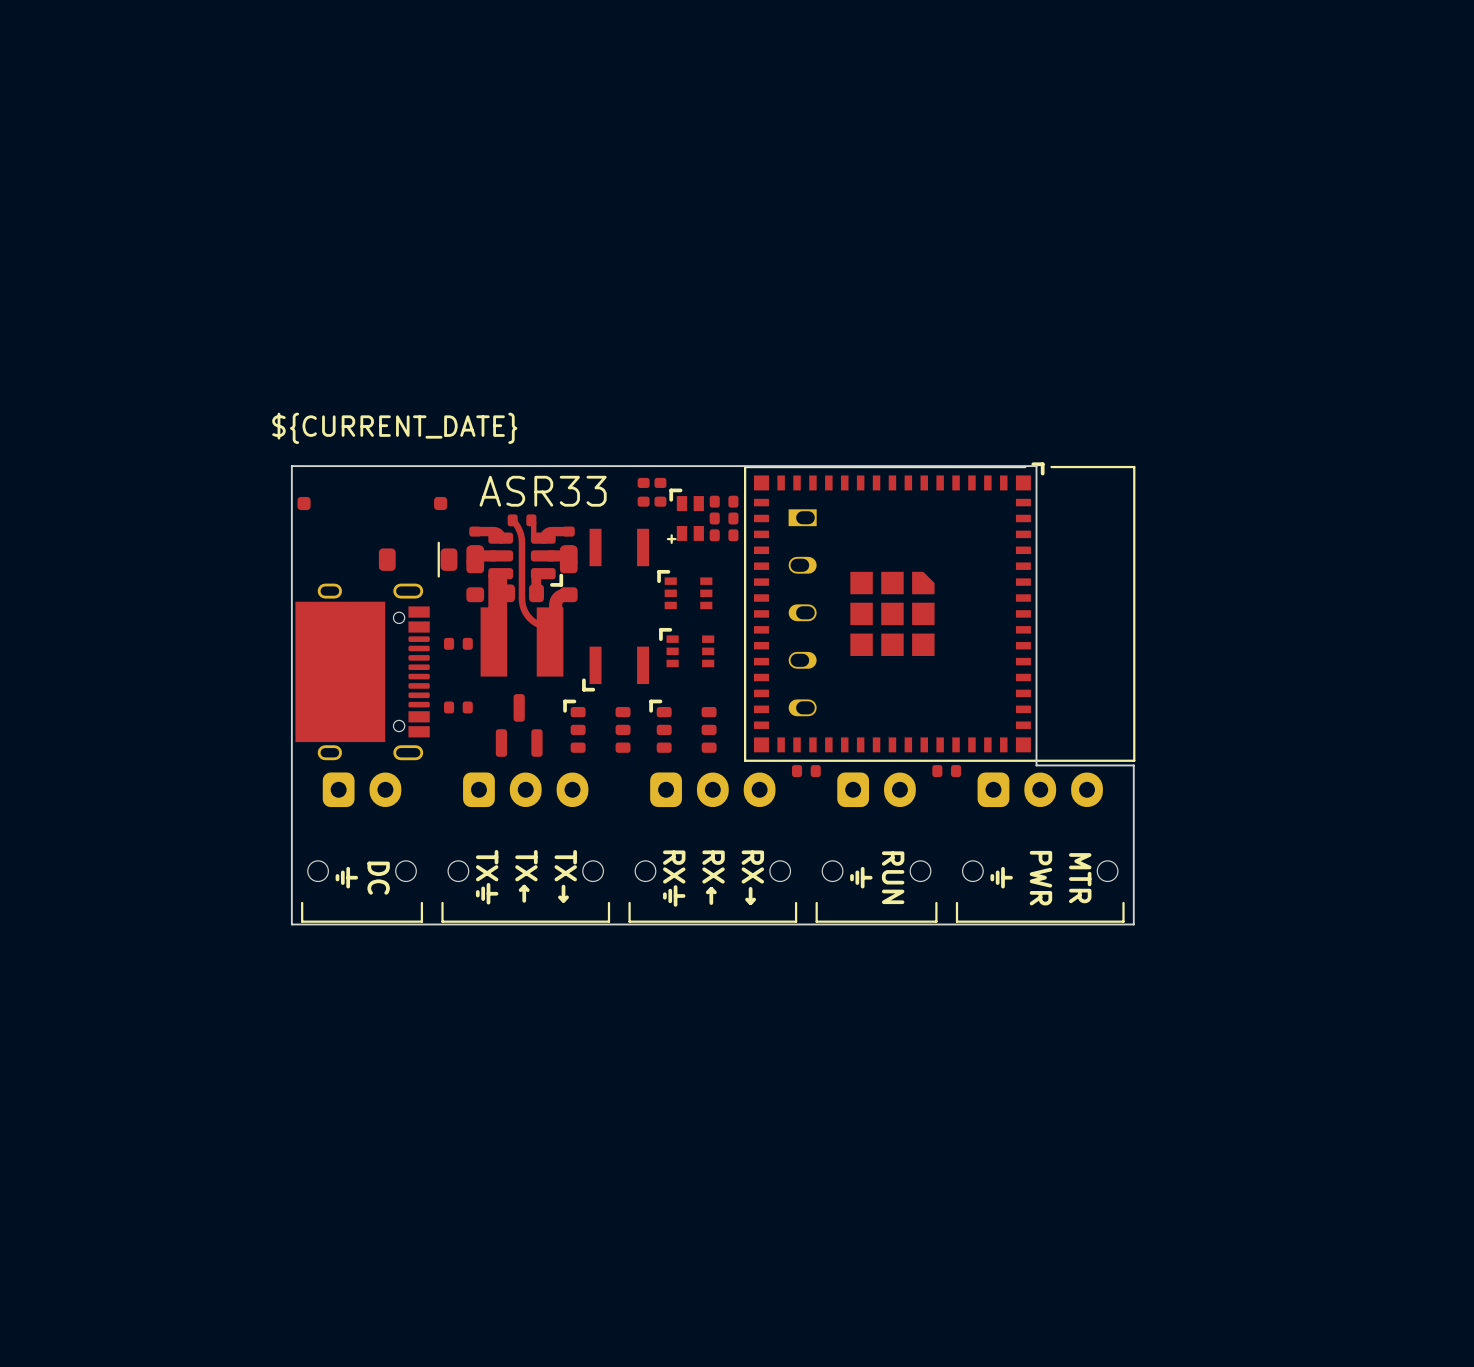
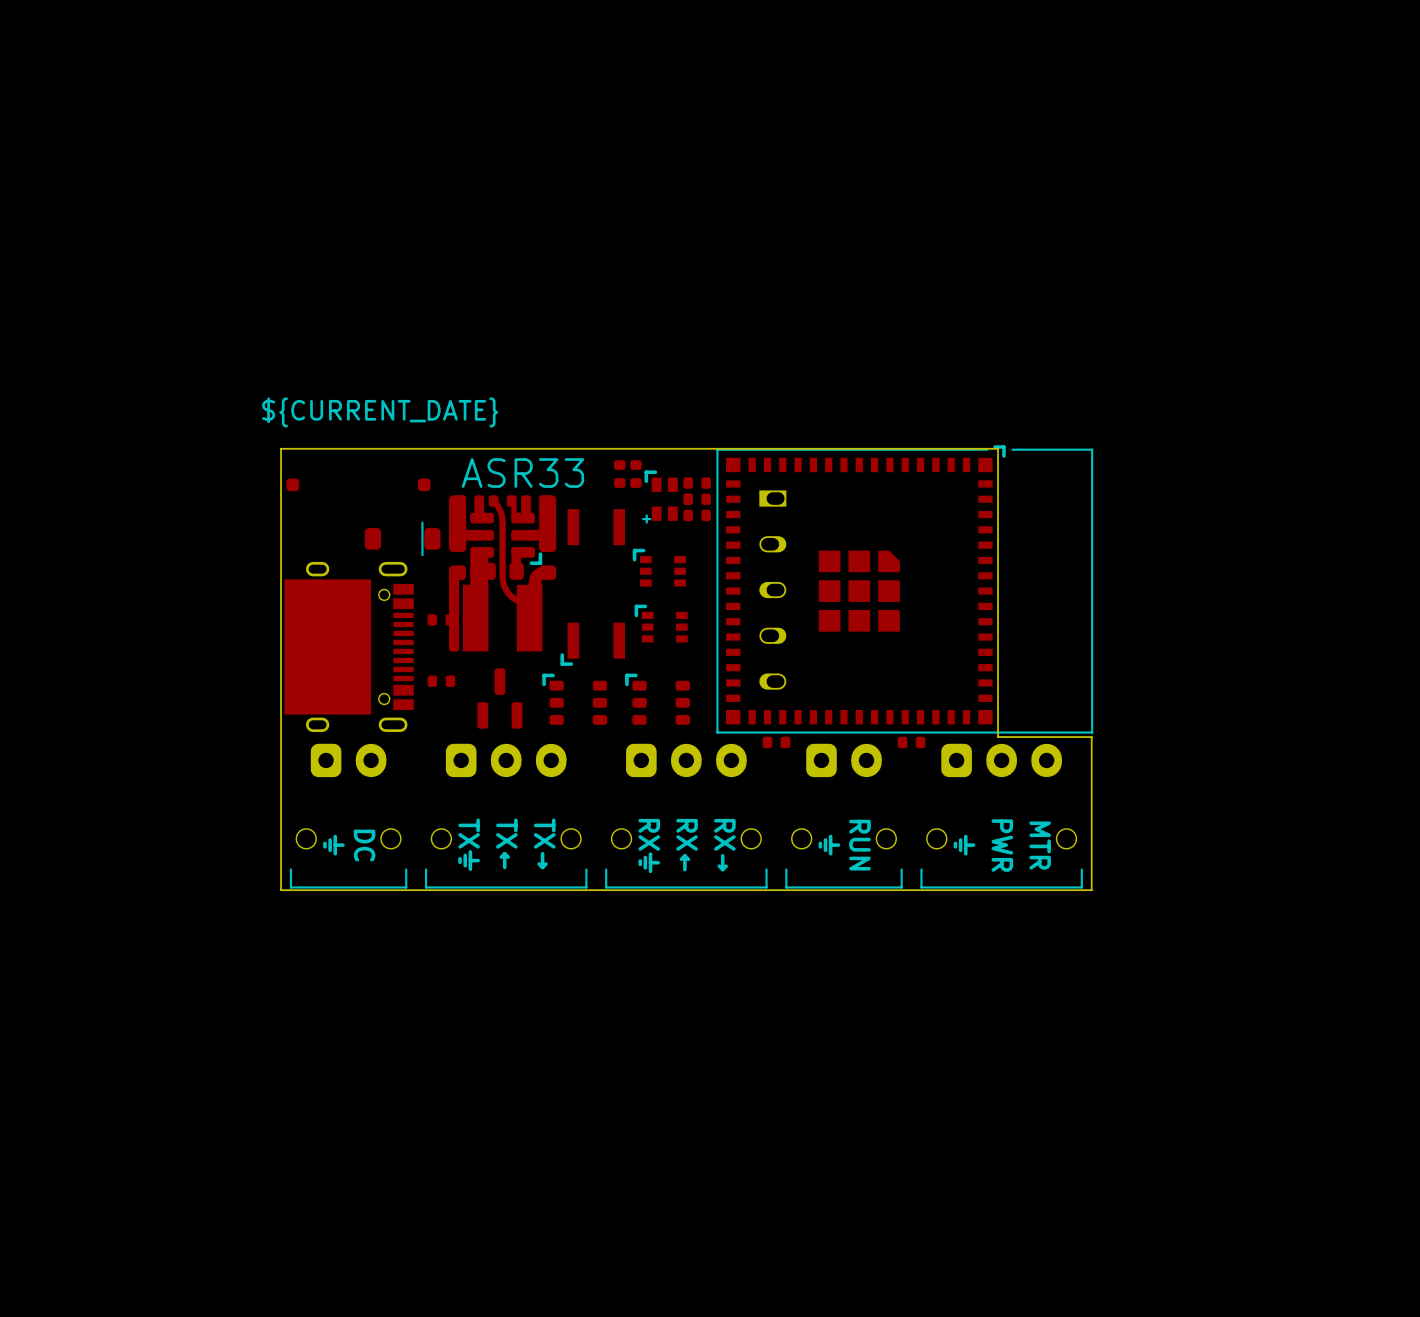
part footprint: [466, 514, 578, 677] -> [449, 495, 557, 652]

